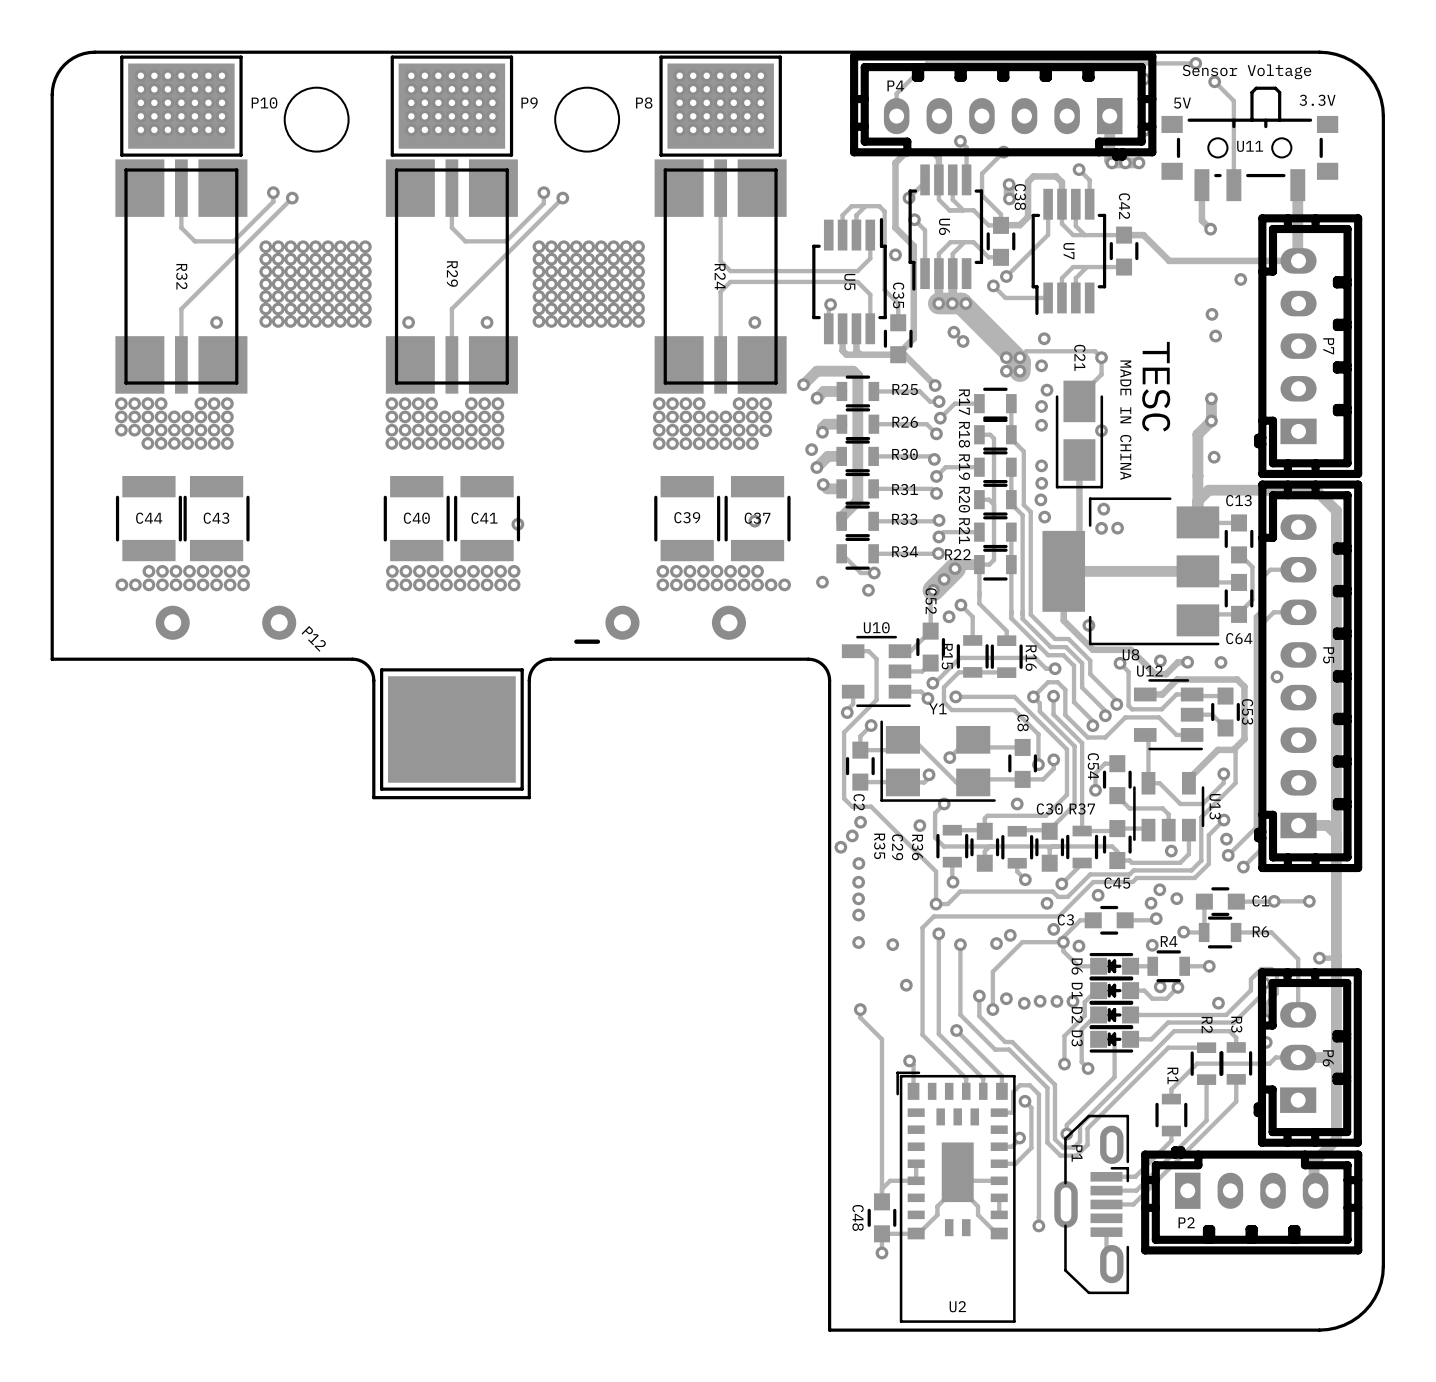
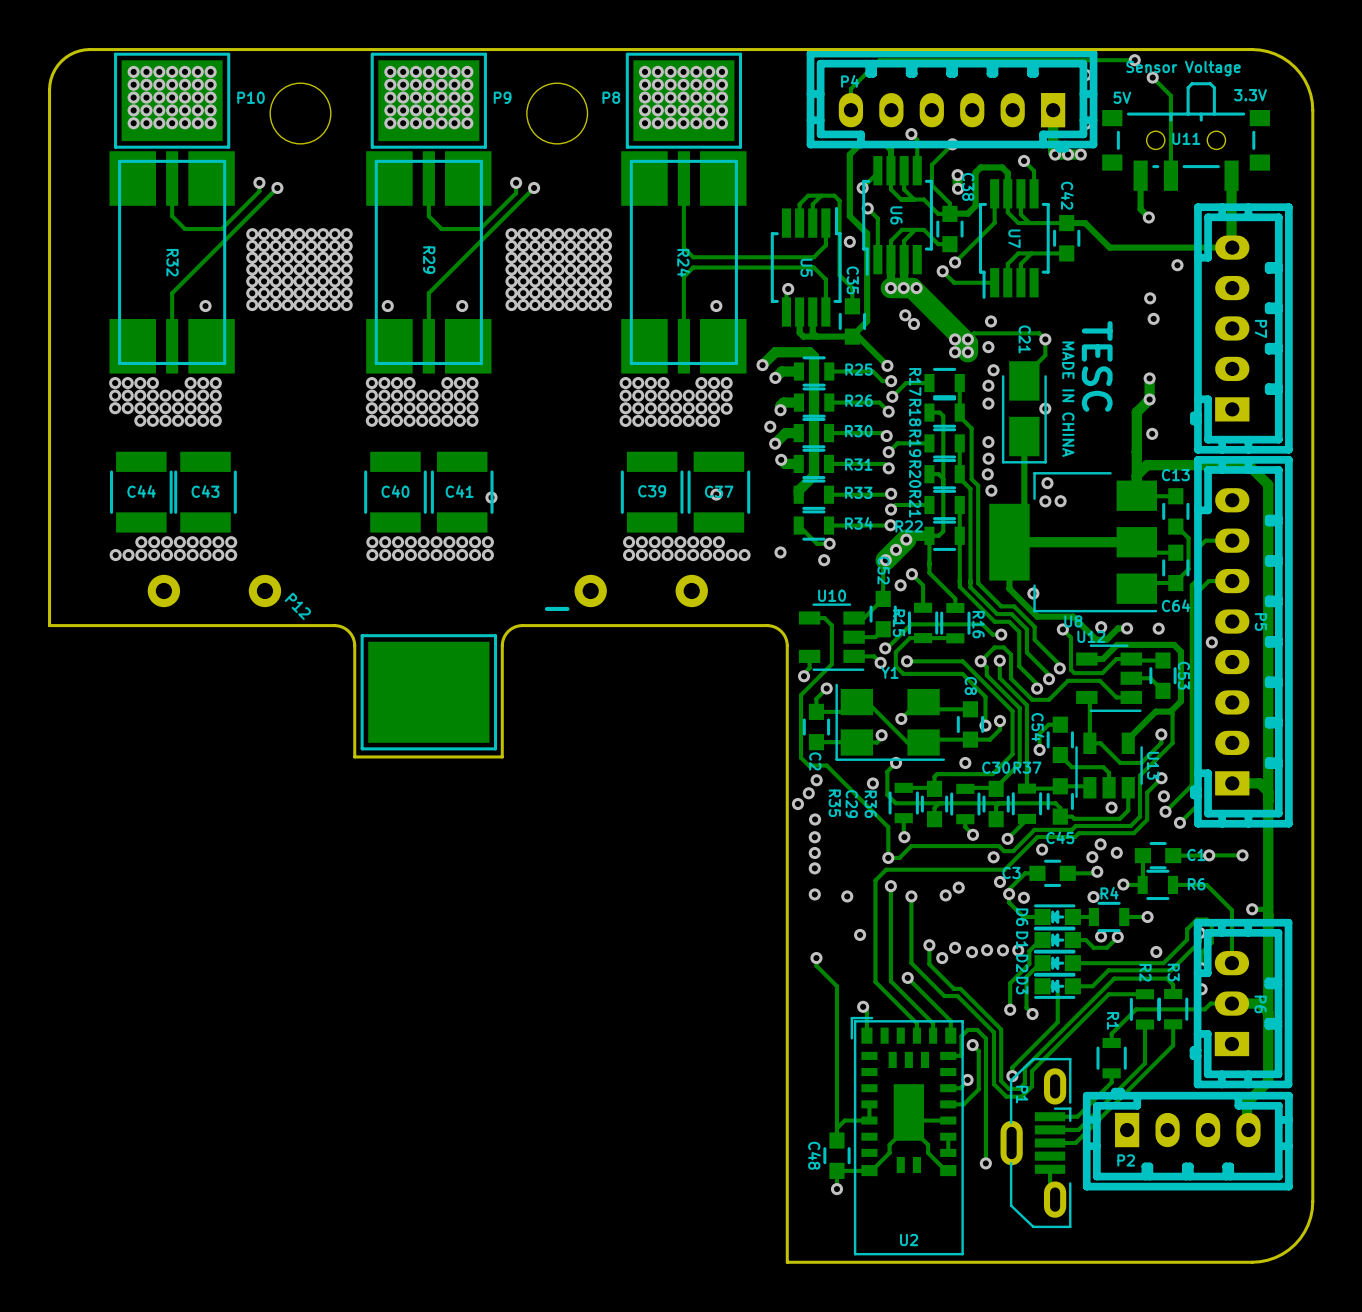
track: (1063, 942) (1022, 942) (992, 971) (992, 1009) -> none

